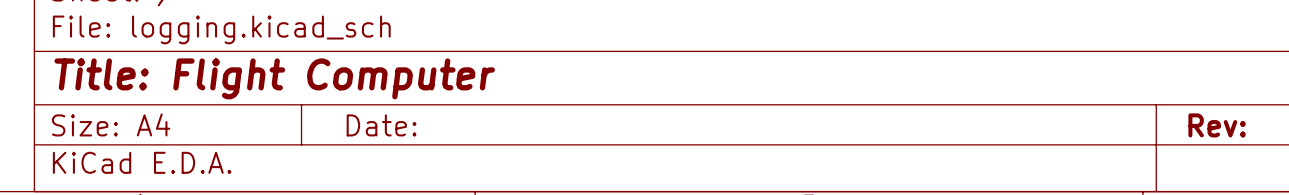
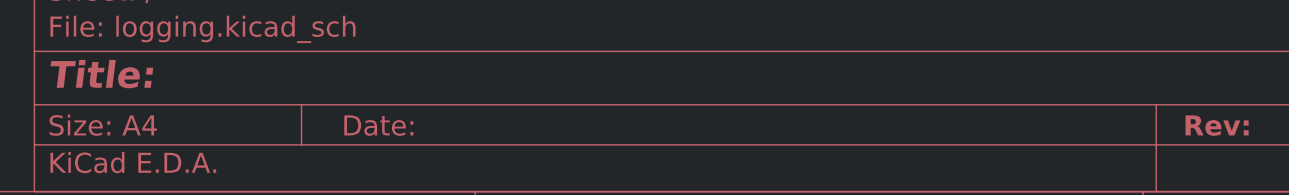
title block: Title: Flight Computer (274, 78) -> Title: (101, 74)

